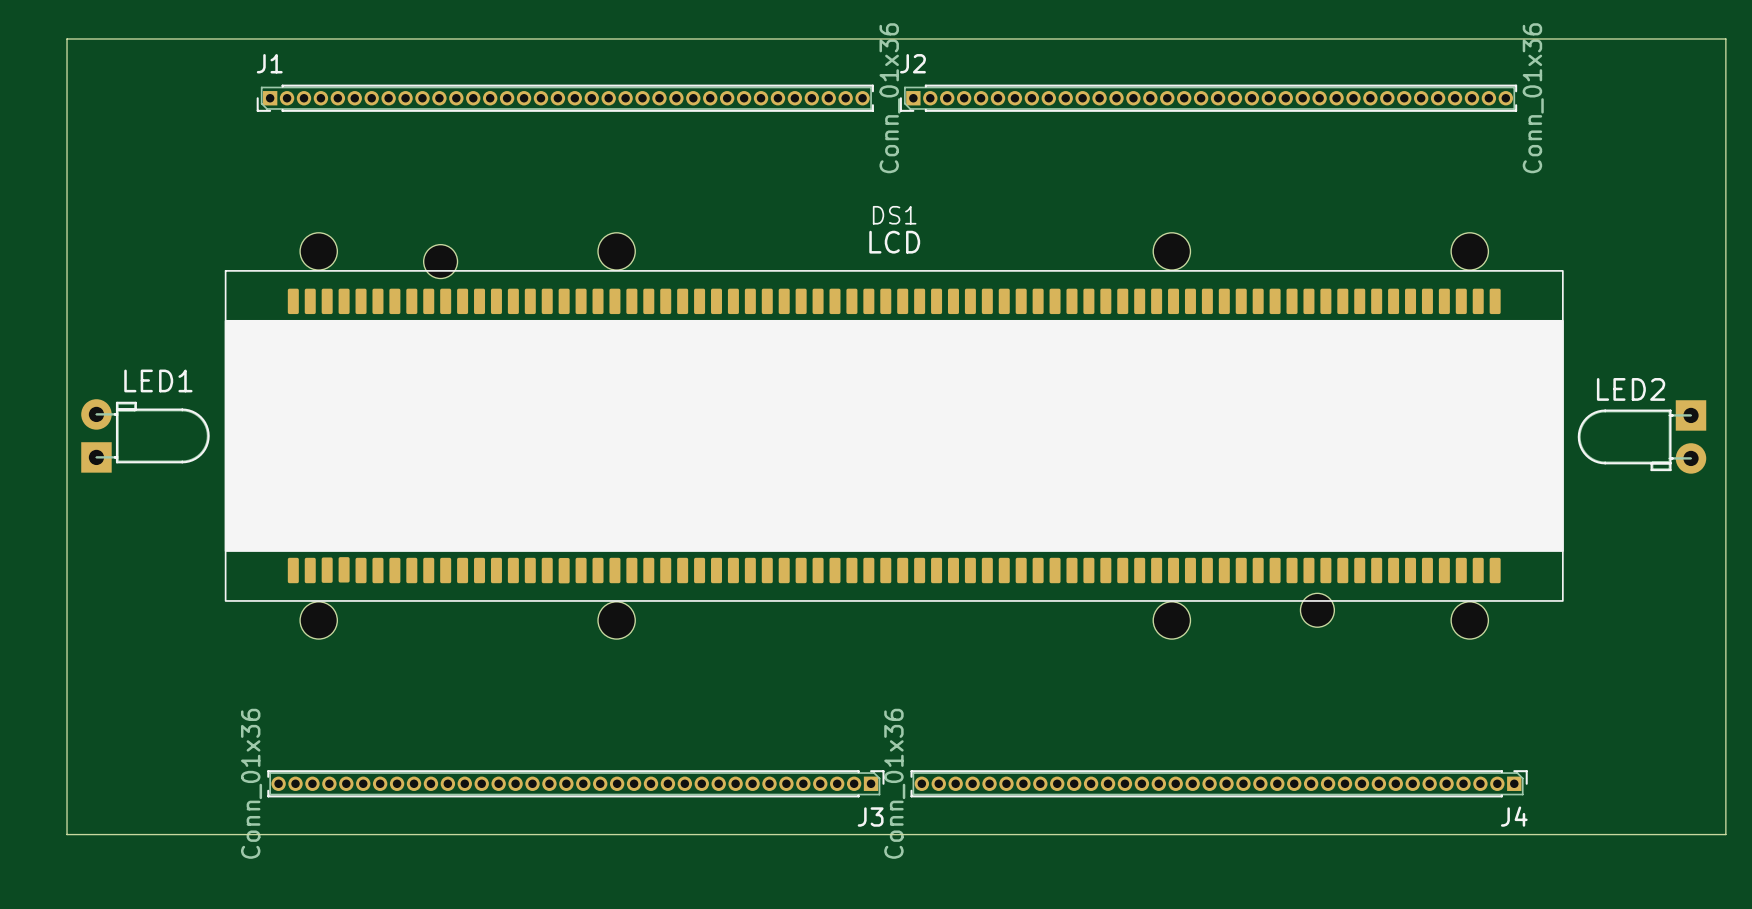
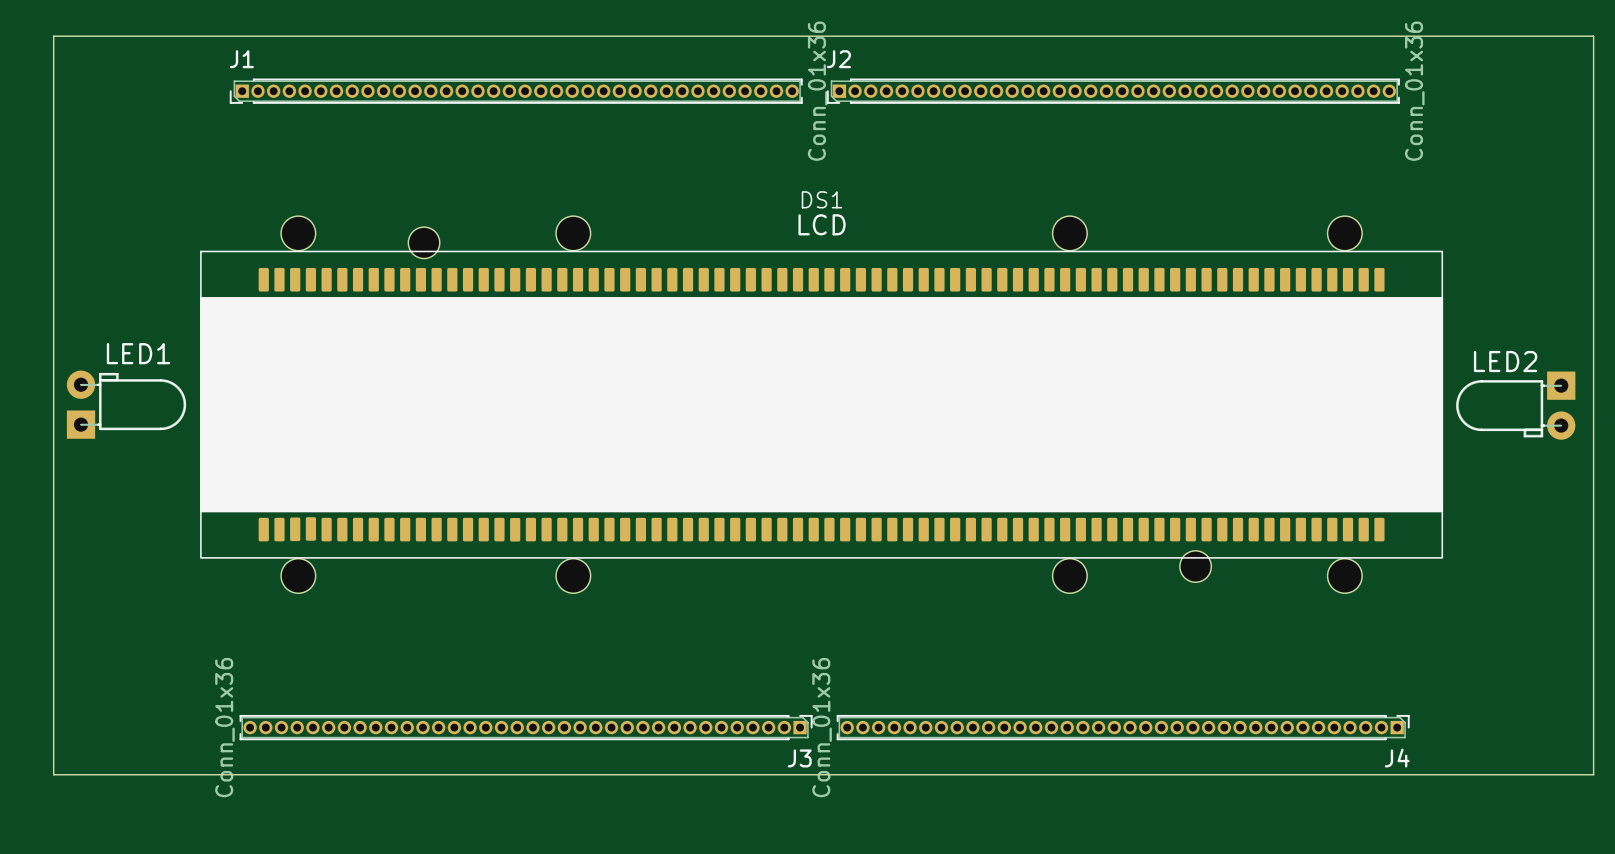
DS1 footprint: [81, 232, 1707, 640] -> [66, 216, 1576, 594]

